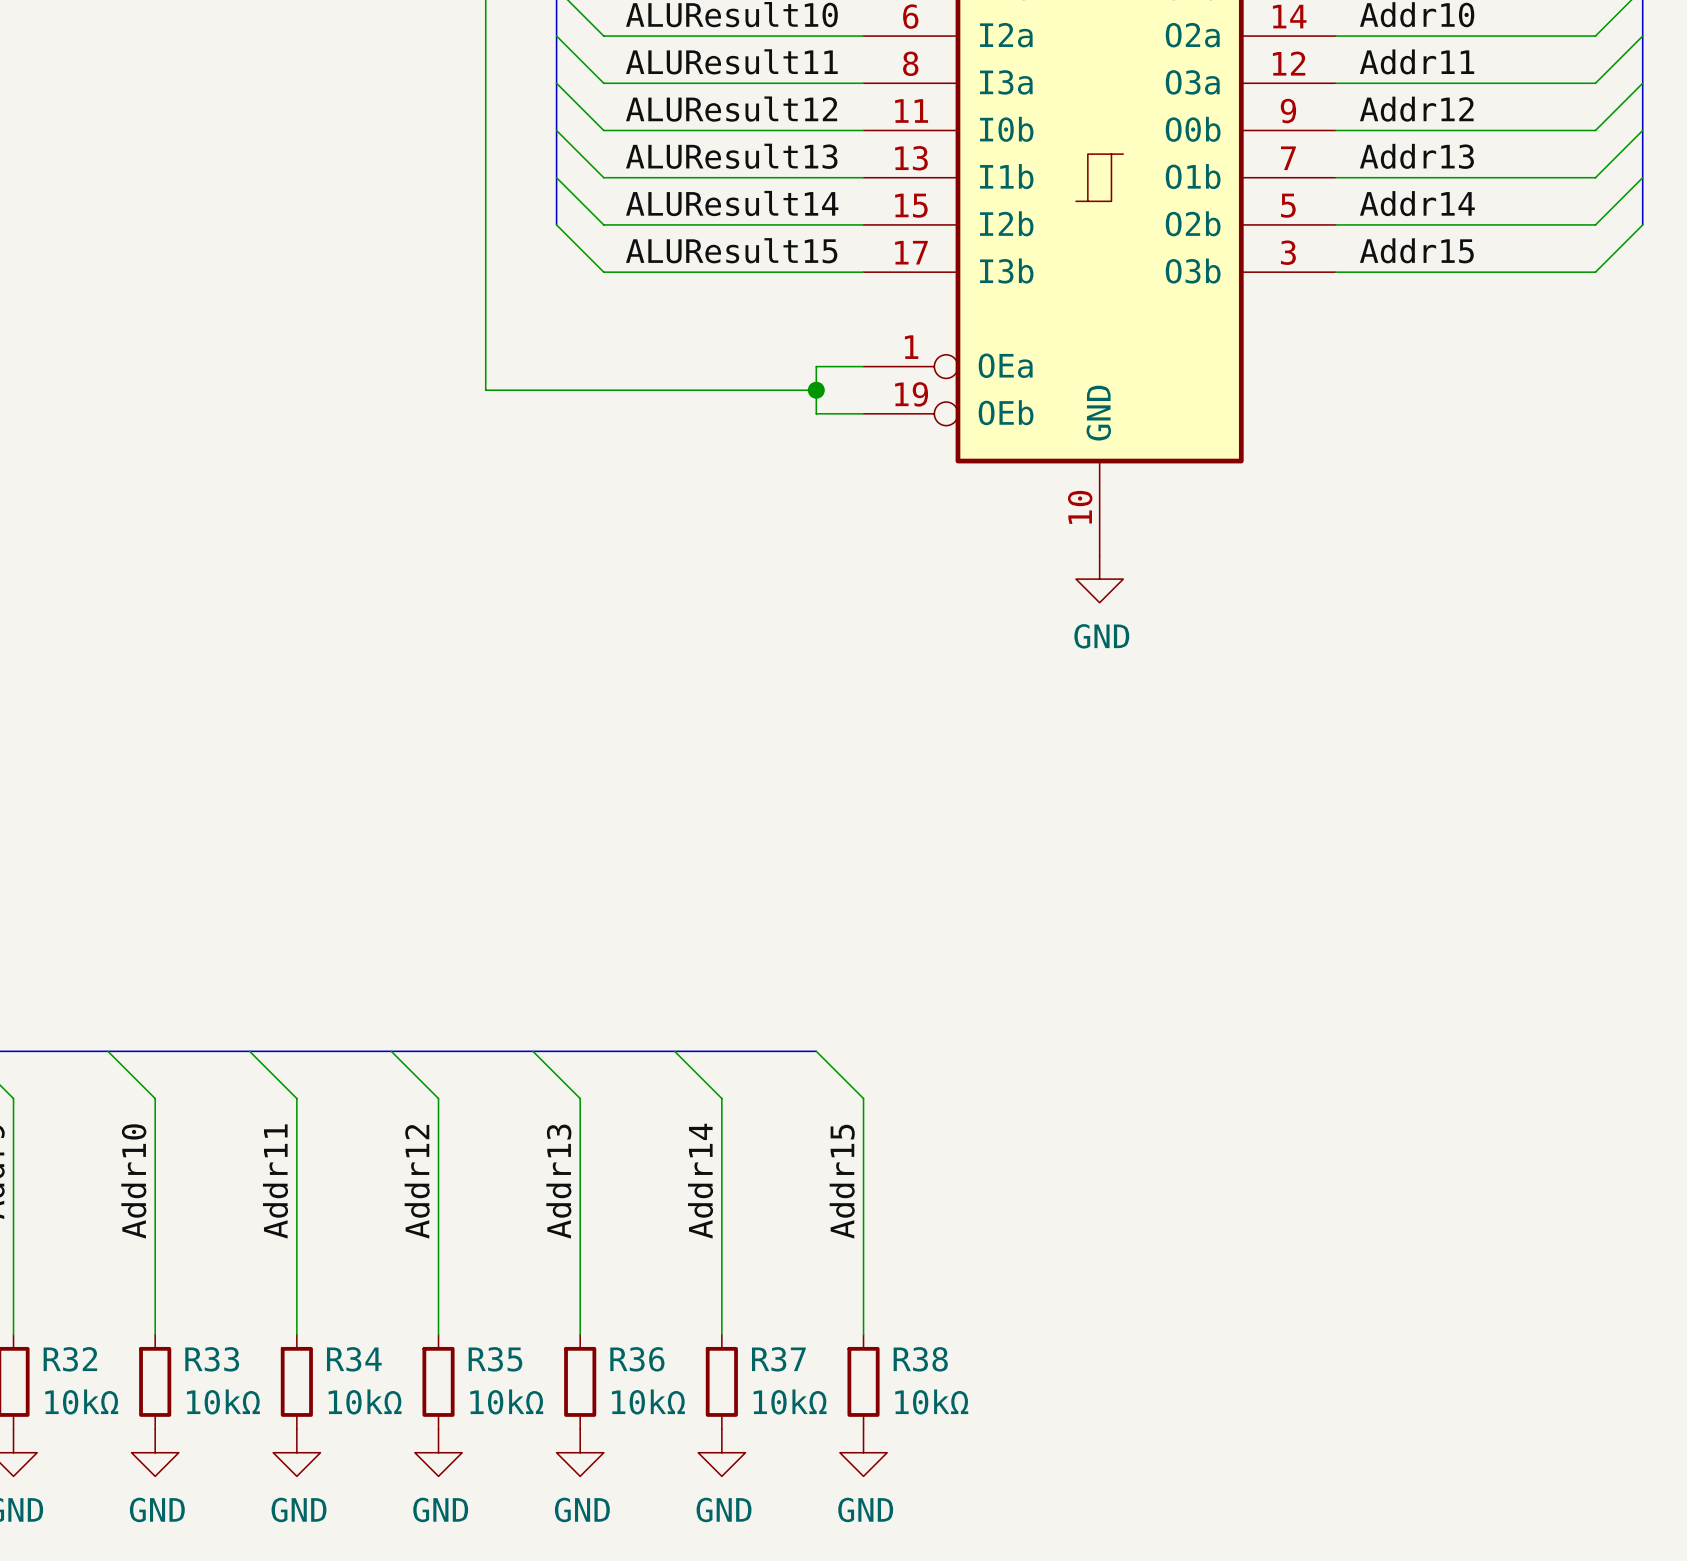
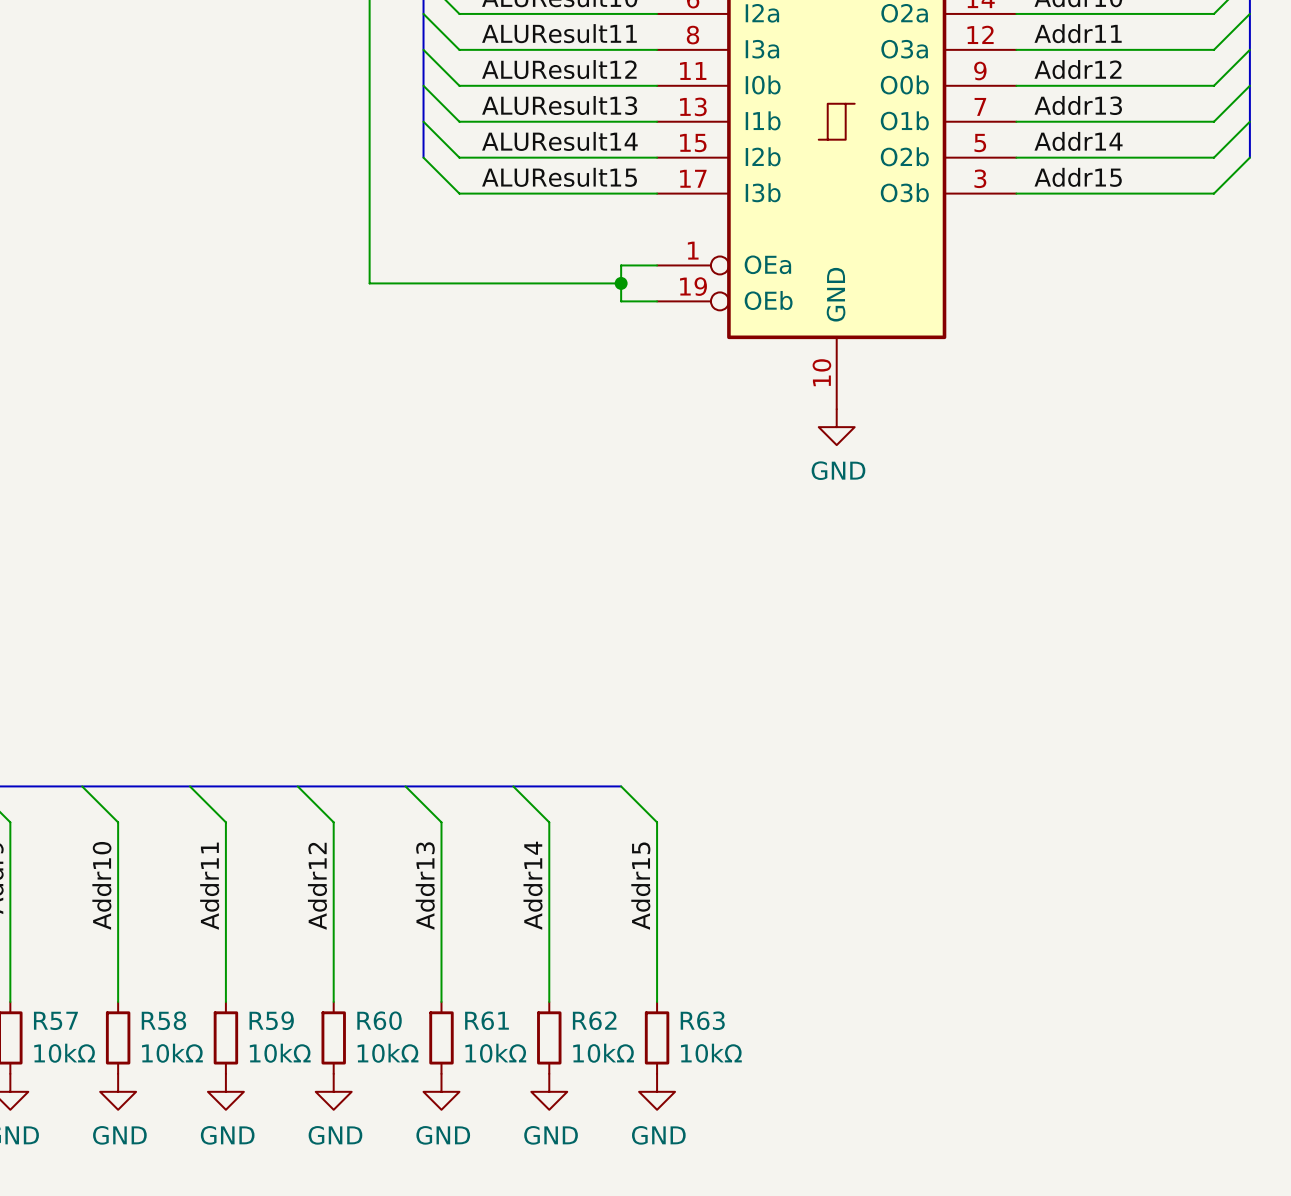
R32 name: R32 (70, 1359) -> R57 (55, 1020)
R33 name: R33 (212, 1359) -> R58 (163, 1020)
R34 name: R34 (354, 1359) -> R59 (271, 1020)
R35 name: R35 (495, 1359) -> R60 (379, 1020)
R36 name: R36 (637, 1359) -> R61 (487, 1020)
R37 name: R37 (778, 1359) -> R62 (594, 1020)
R38 name: R38 (920, 1359) -> R63 (702, 1020)

